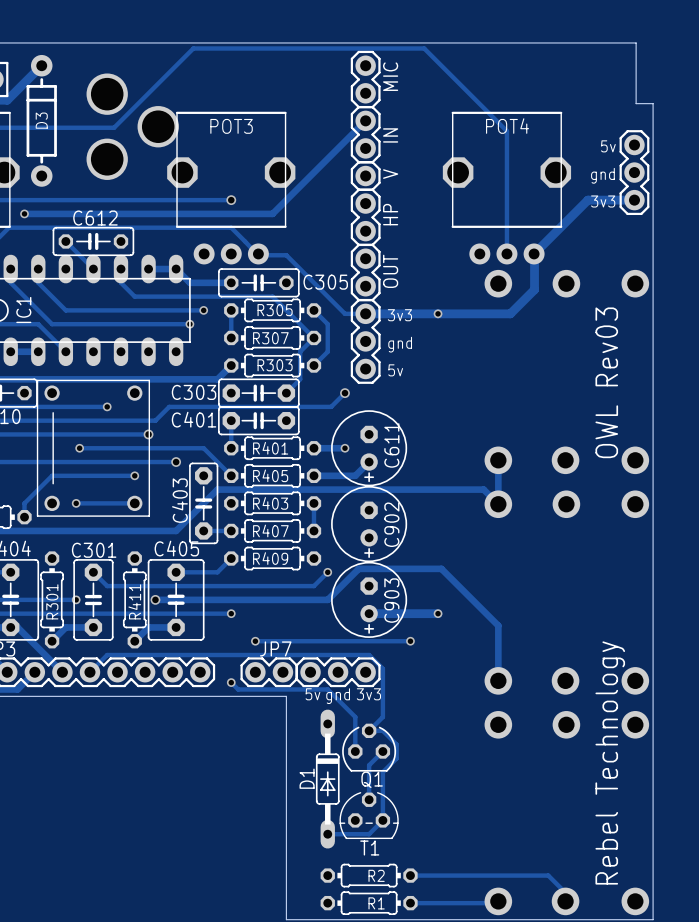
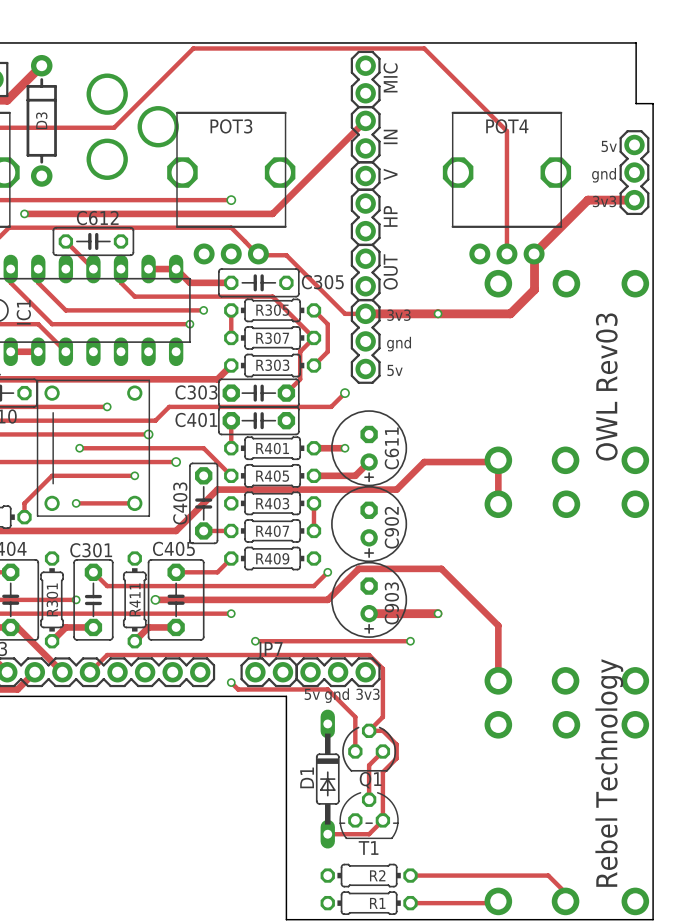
track: (396, 489) (483, 489) (498, 504) -> (396, 489) (424, 462) (496, 462) (498, 460)

